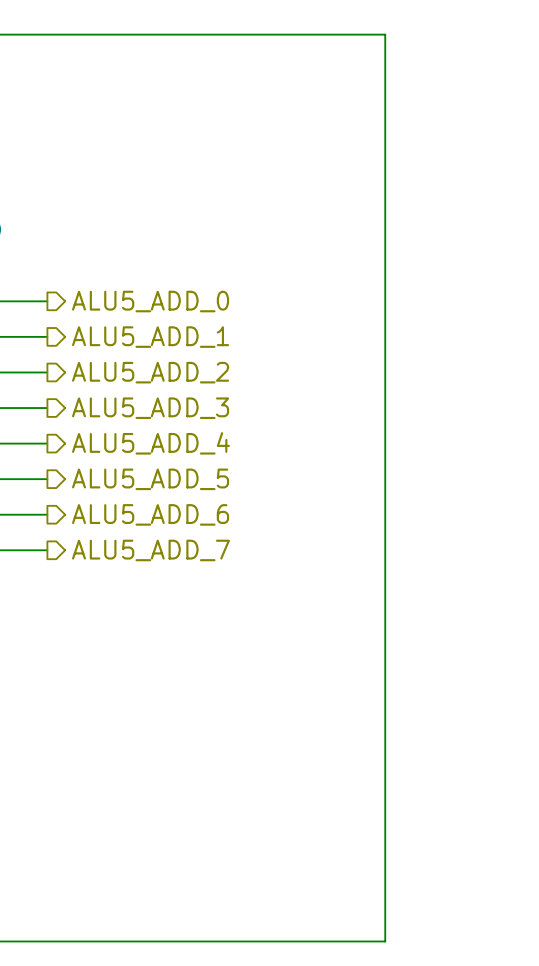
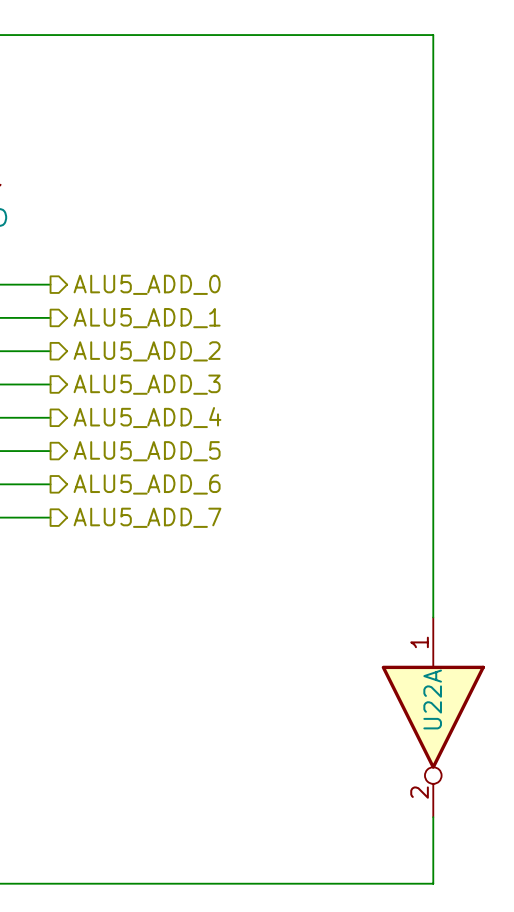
wire: (385, 34) (385, 941) -> (366, 35) (433, 35) (433, 617)
U22A: none -> (433, 717)
wire: none -> (433, 817) (433, 883) (366, 883)

